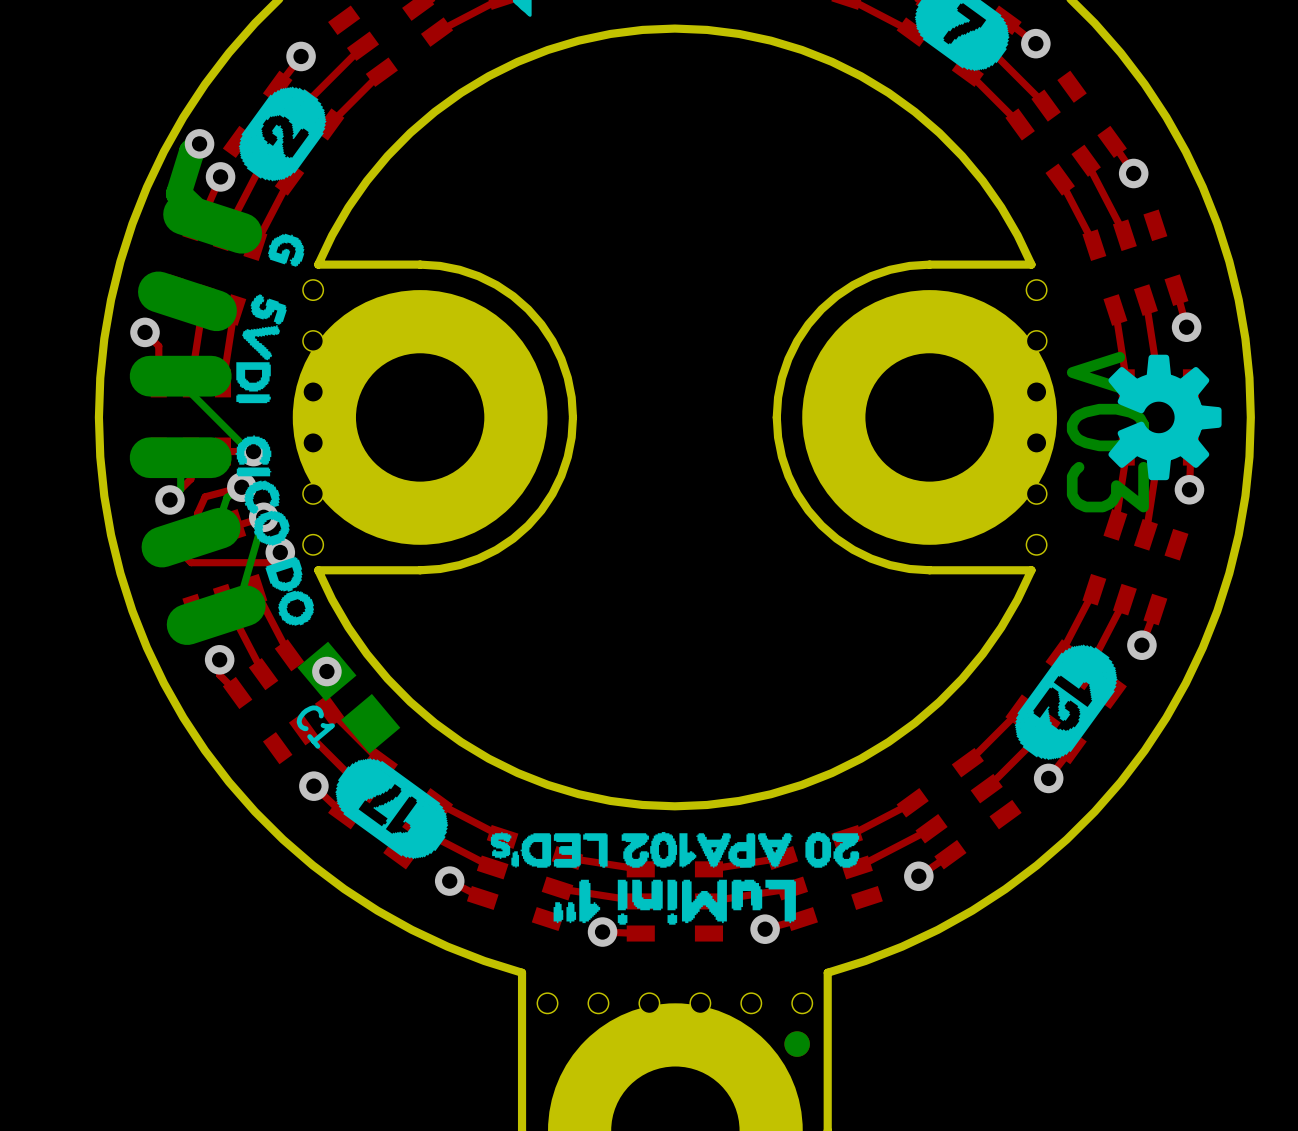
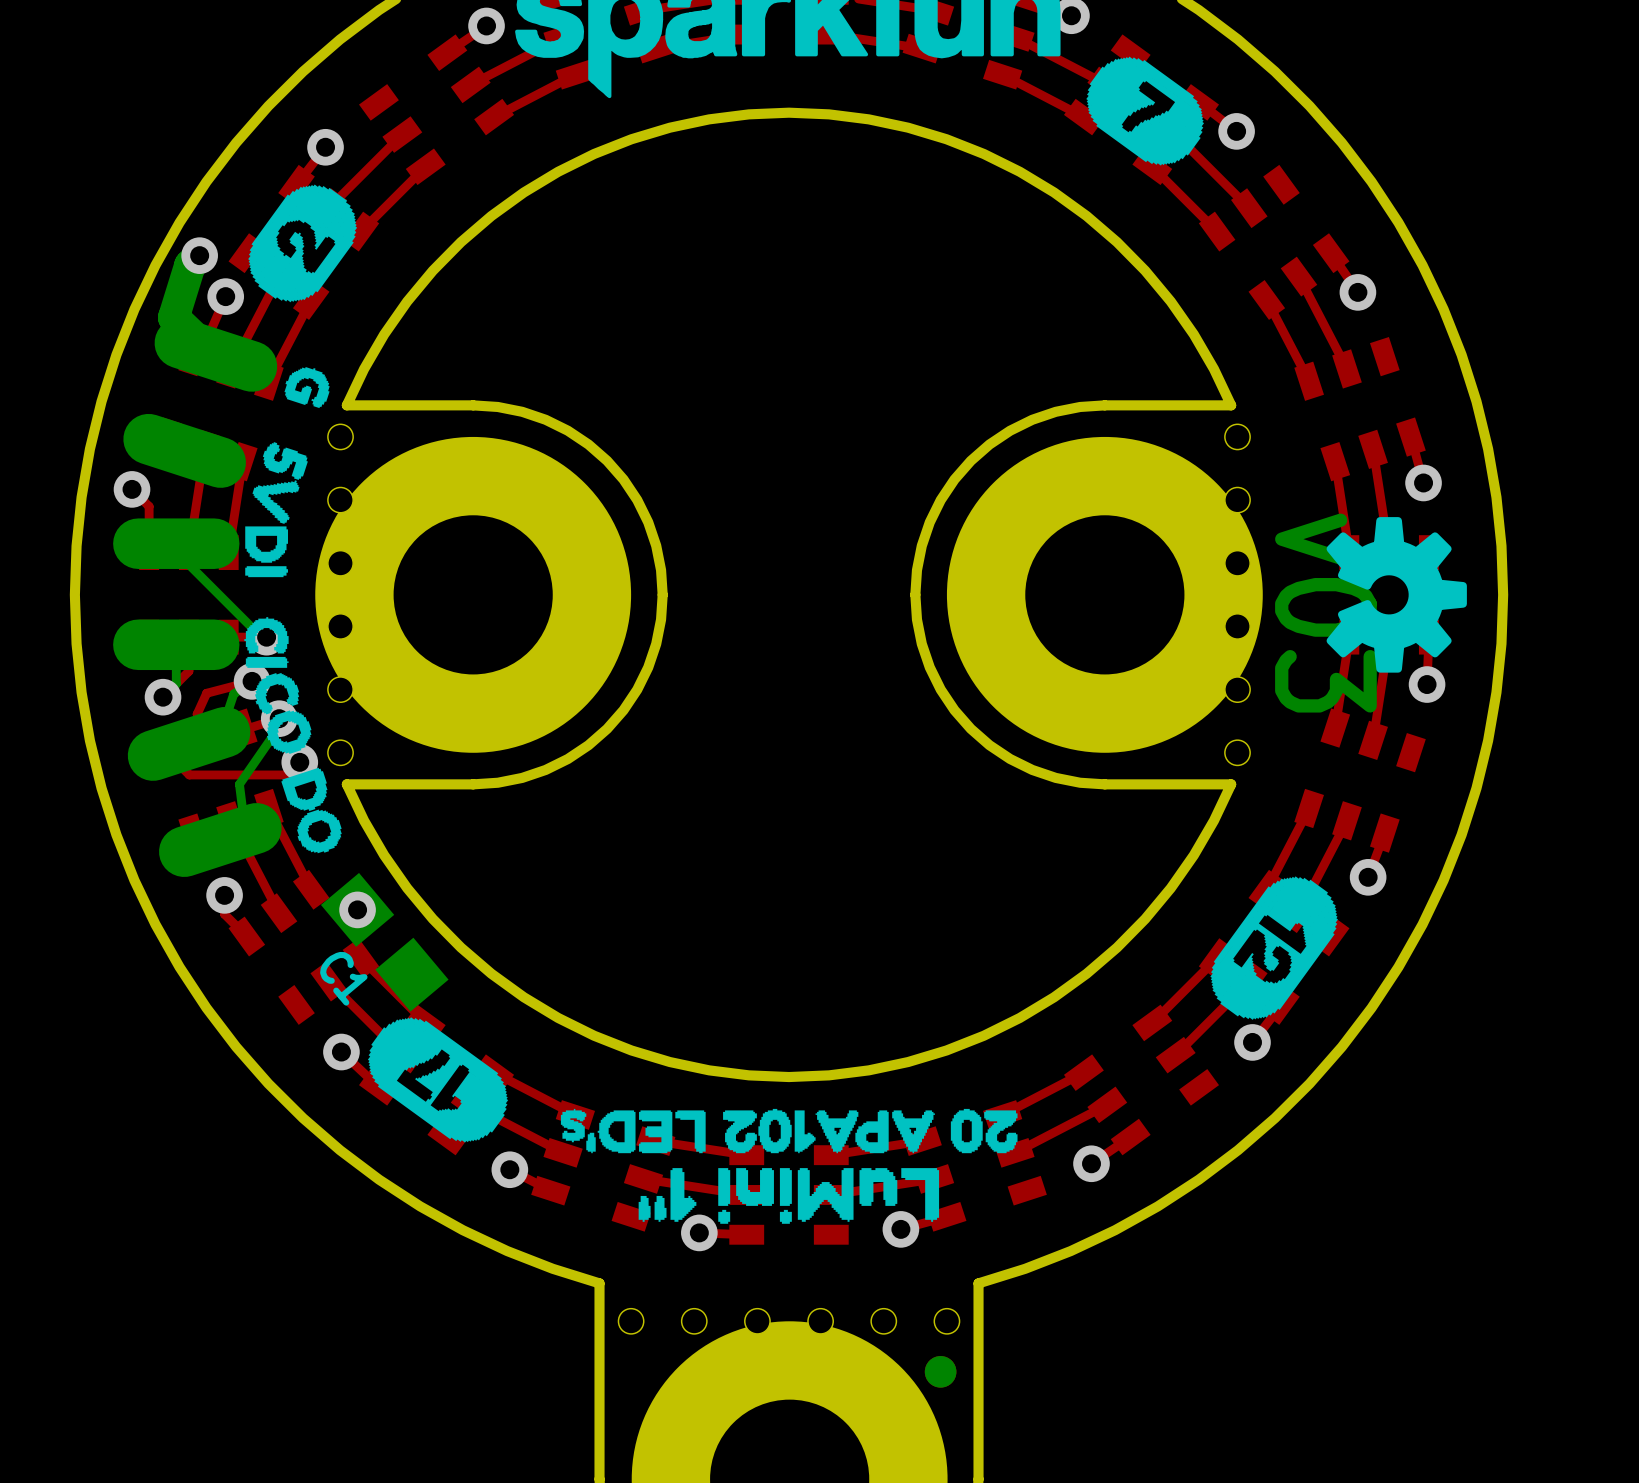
bottom track: (263, 517) (236, 611) -> (286, 716) (239, 784) (245, 834)

